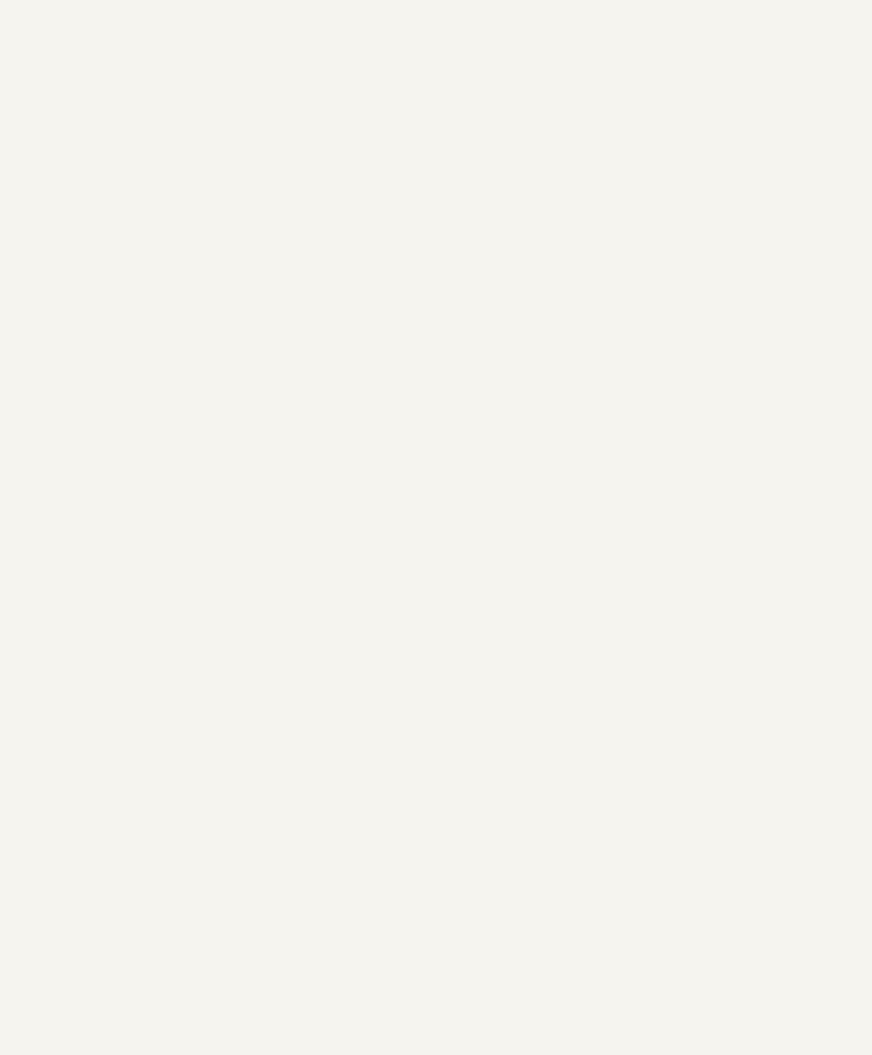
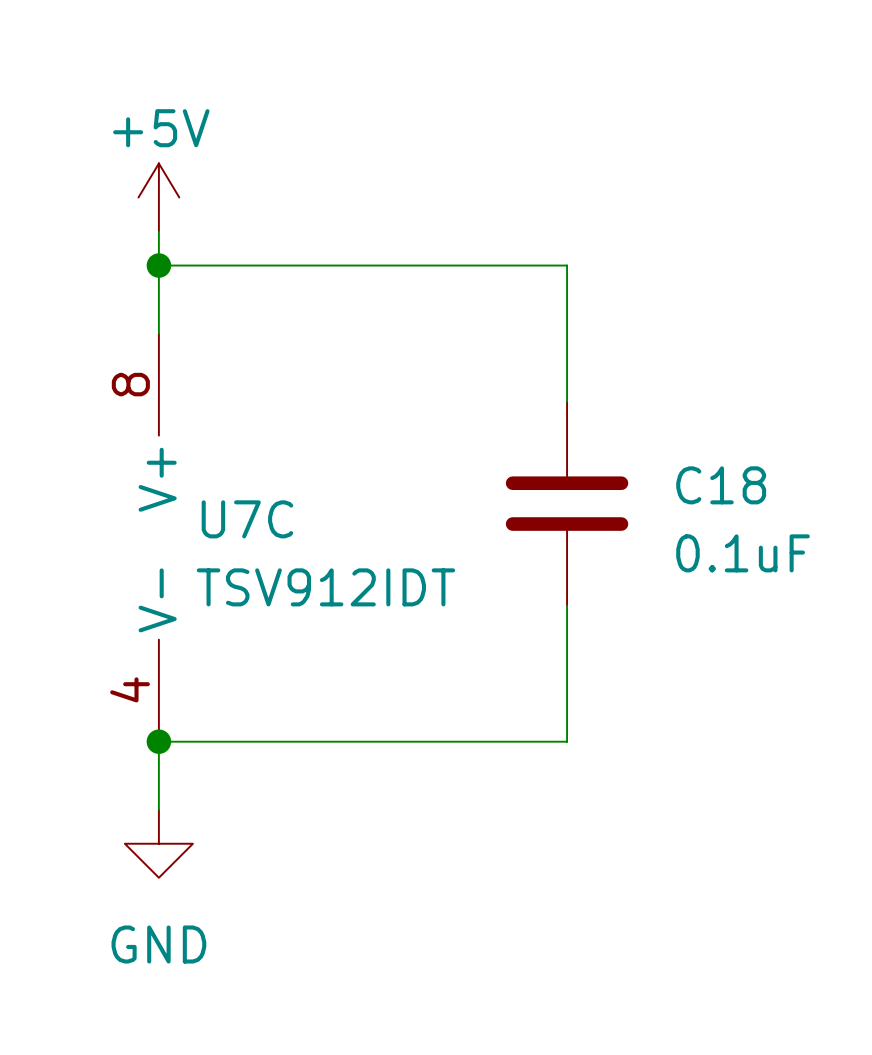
power symbol: none -> +5V (158, 197)
wire: none -> (158, 231) (158, 333)
wire: none -> (158, 265) (567, 265) (567, 401)
junction: none -> (158, 265)
C18: none -> 0.1uF (567, 503)
U7C: none -> TSV912IDT (158, 537)
wire: none -> (567, 605) (567, 741) (158, 741) (158, 809)
junction: none -> (158, 741)
power symbol: none -> GND (158, 843)

